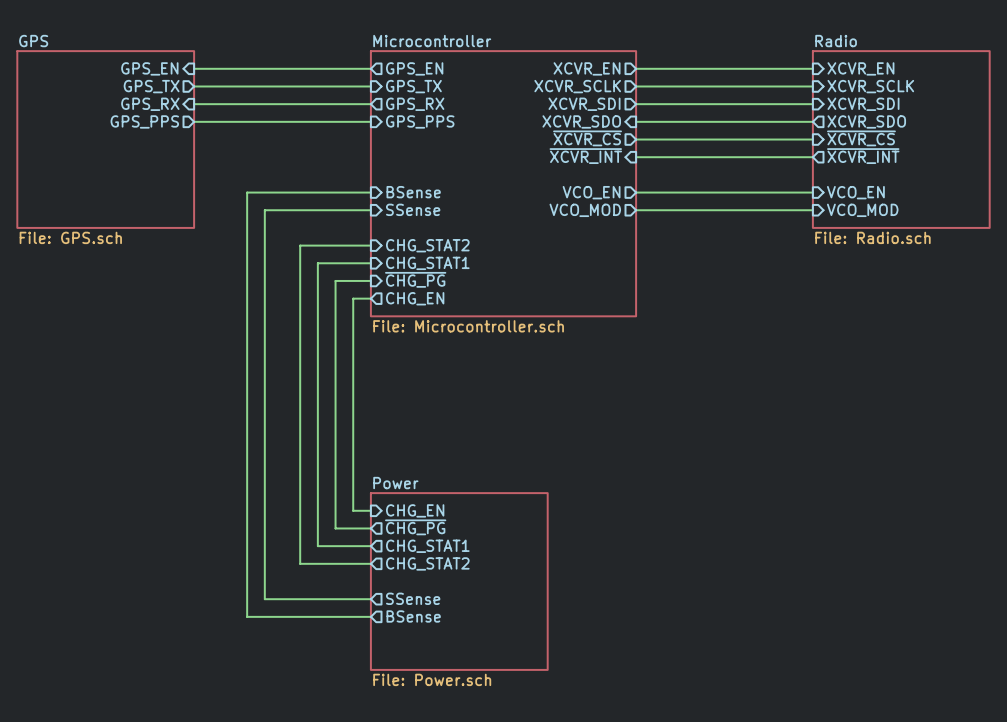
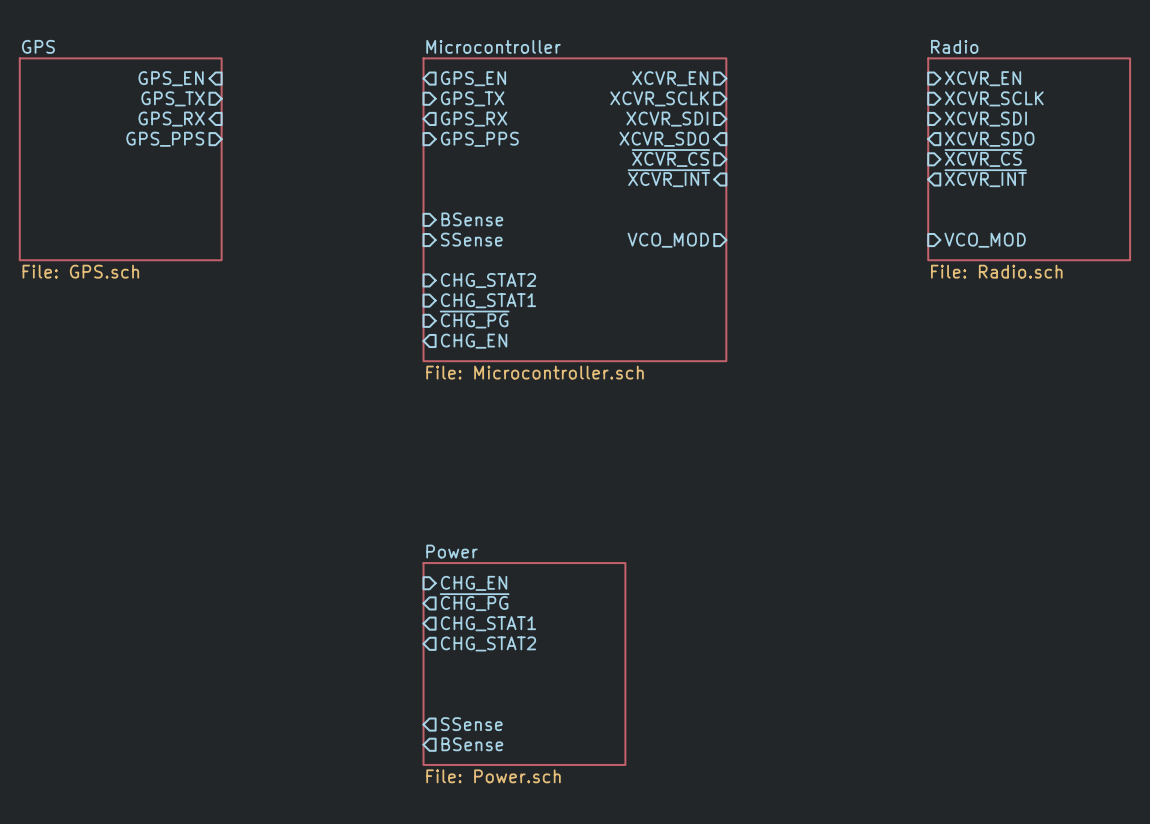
wire: (194, 68) (370, 68) -> none
wire: (636, 68) (812, 68) -> none
wire: (194, 86) (370, 86) -> none
wire: (636, 86) (812, 86) -> none
wire: (194, 104) (370, 104) -> none
wire: (636, 104) (812, 104) -> none
wire: (194, 121) (370, 121) -> none
wire: (636, 121) (812, 121) -> none
wire: (636, 139) (812, 139) -> none
wire: (636, 157) (812, 157) -> none
wire: (370, 192) (247, 192) (247, 616) (370, 616) -> none
sheet pin: VCO_EN (591, 192) -> none
wire: (636, 192) (812, 192) -> none
sheet pin: VCO_EN (855, 192) -> none
wire: (370, 210) (264, 210) (264, 599) (370, 599) -> none
wire: (636, 210) (812, 210) -> none
wire: (370, 245) (300, 245) (300, 563) (370, 563) -> none
wire: (370, 263) (317, 263) (317, 546) (370, 546) -> none
wire: (370, 280) (335, 280) (335, 528) (370, 528) -> none
wire: (370, 298) (353, 298) (353, 510) (370, 510) -> none
sheet pin position: SSense (413, 598) -> SSense (471, 724)
sheet pin position: BSense (413, 616) -> BSense (472, 744)

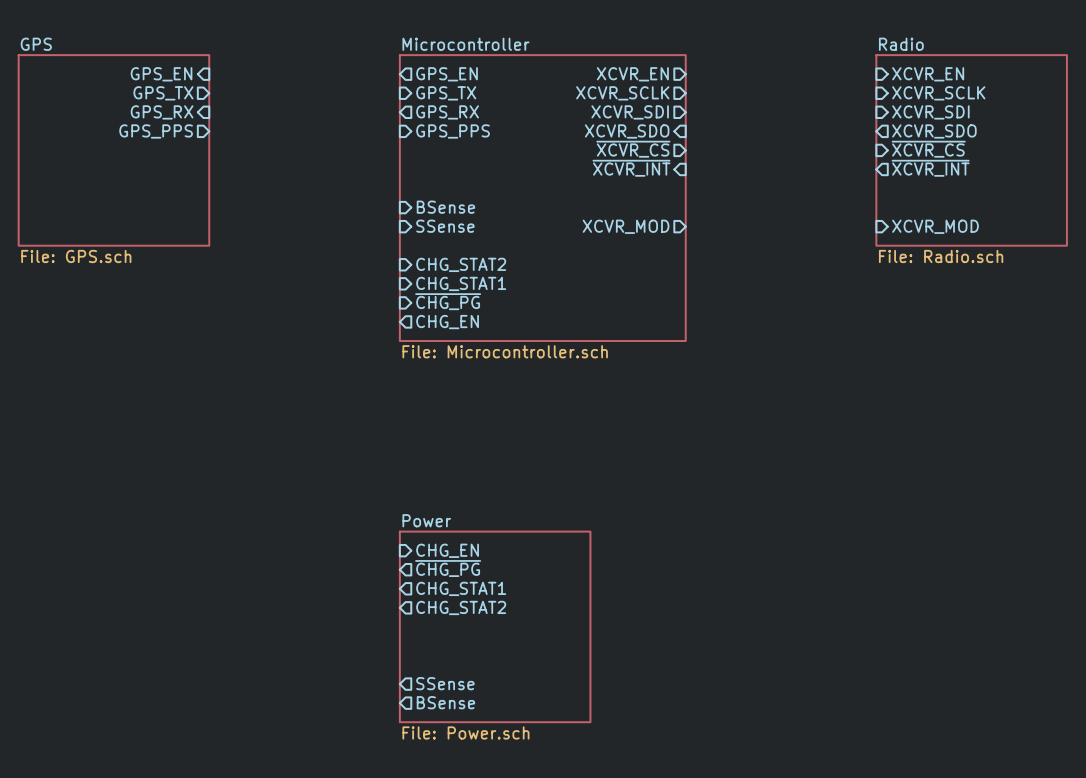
sheet pin: VCO_MOD (668, 240) -> XCVR_MOD (626, 226)
sheet pin: VCO_MOD (985, 240) -> XCVR_MOD (935, 226)

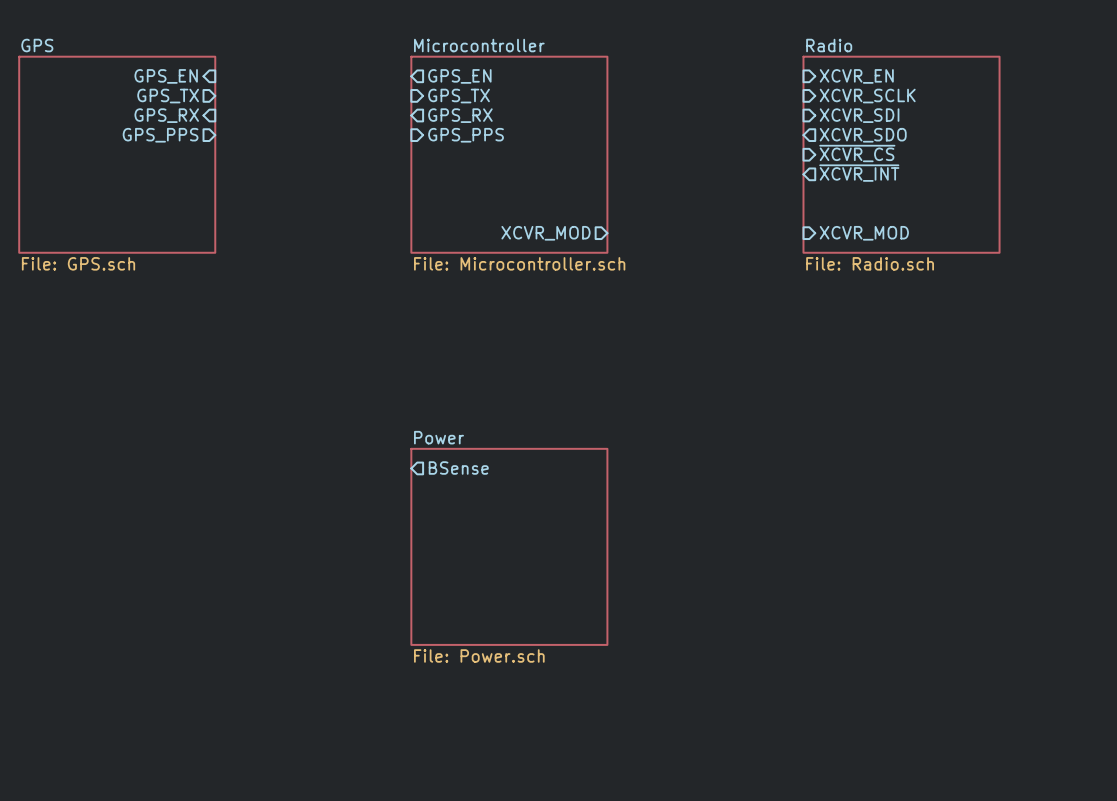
sheet pin: XCVR_EN (632, 74) -> none
sheet pin: none -> XCVR_EN (856, 76)
sheet pin: XCVR_EN (928, 74) -> none
sheet pin: XCVR_SCLK (622, 93) -> none
sheet pin: none -> XCVR_SCLK (867, 96)
sheet pin: XCVR_SCLK (938, 93) -> none
sheet pin: XCVR_SDI (630, 112) -> none
sheet pin: none -> XCVR_SDI (859, 115)
sheet pin: XCVR_SDI (930, 112) -> none
sheet pin: XCVR_SDO (627, 131) -> none
sheet pin: none -> XCVR_SDO (863, 135)
sheet pin: XCVR_SDO (934, 131) -> none
sheet pin: ~{XCVR_CS} (633, 149) -> none
sheet pin: none -> ~{XCVR_CS} (857, 153)
sheet pin: ~{XCVR_CS} (928, 149) -> none
sheet Microcontroller: none -> File: Microcontroller.sch (509, 154)
sheet Radio position: (971, 150) -> (901, 154)
sheet pin: ~{XCVR_INT} (631, 168) -> none
sheet pin: none -> ~{XCVR_INT} (859, 173)
sheet pin: ~{XCVR_INT} (930, 168) -> none
sheet Microcontroller: File: Microcontroller.sch (542, 198) -> none
sheet pin: BSense (445, 207) -> none
sheet pin: SSense (445, 226) -> none
sheet pin position: XCVR_MOD (626, 226) -> XCVR_MOD (545, 233)
sheet pin position: XCVR_MOD (935, 226) -> XCVR_MOD (864, 233)
sheet pin: CHG_STAT2 (461, 264) -> none
sheet pin: CHG_STAT1 (461, 283) -> none
sheet pin: ~{CHG_PG} (448, 301) -> none
sheet pin: CHG_EN (447, 322) -> none
sheet pin: none -> BSense (458, 468)
sheet pin: CHG_EN (447, 550) -> none
sheet pin: ~{CHG_PG} (448, 568) -> none
sheet pin: CHG_STAT1 (461, 588) -> none
sheet pin: CHG_STAT2 (461, 607) -> none
sheet Power position: (495, 626) -> (509, 546)
sheet pin: SSense (445, 683) -> none
sheet pin: BSense (445, 702) -> none

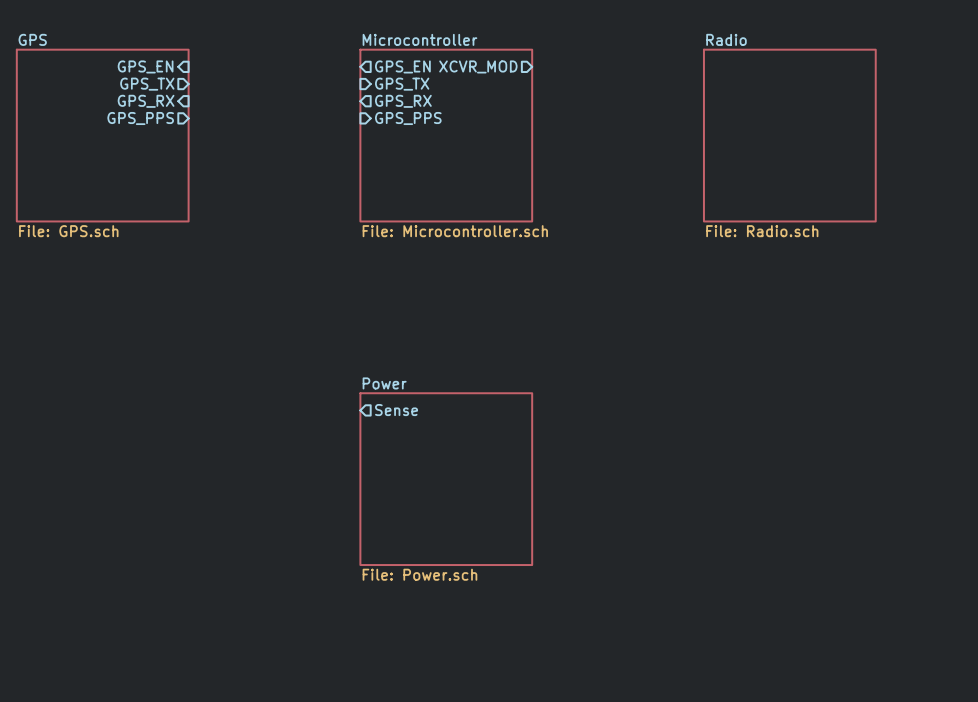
sheet pin: none -> XCVR_MOD (478, 66)
sheet pin: XCVR_EN (856, 76) -> none
sheet pin: XCVR_SCLK (867, 96) -> none
sheet pin: XCVR_SDI (859, 115) -> none
sheet pin: XCVR_SDO (863, 135) -> none
sheet pin: ~{XCVR_CS} (857, 153) -> none
sheet pin: ~{XCVR_INT} (859, 173) -> none
sheet pin: XCVR_MOD (545, 233) -> none
sheet pin: XCVR_MOD (864, 233) -> none
sheet pin: BSense (458, 468) -> Sense (396, 410)

